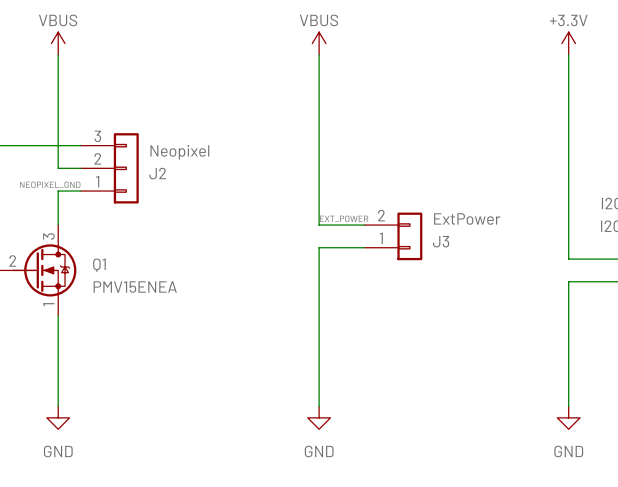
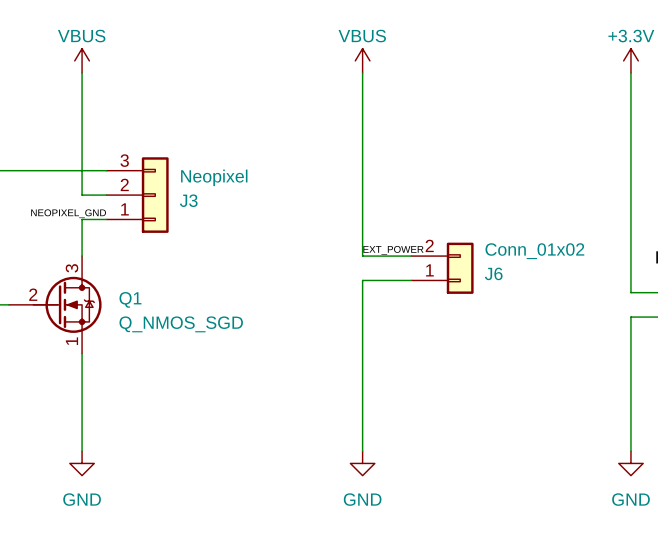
J2 name: J2 (157, 173) -> J3 (188, 200)
J3 value: ExtPower (467, 219) -> Conn_01x02 (534, 251)
J3 name: J3 (441, 241) -> J6 (493, 273)
Q1 value: PMV15ENEA (135, 287) -> Q_NMOS_SGD (181, 324)

